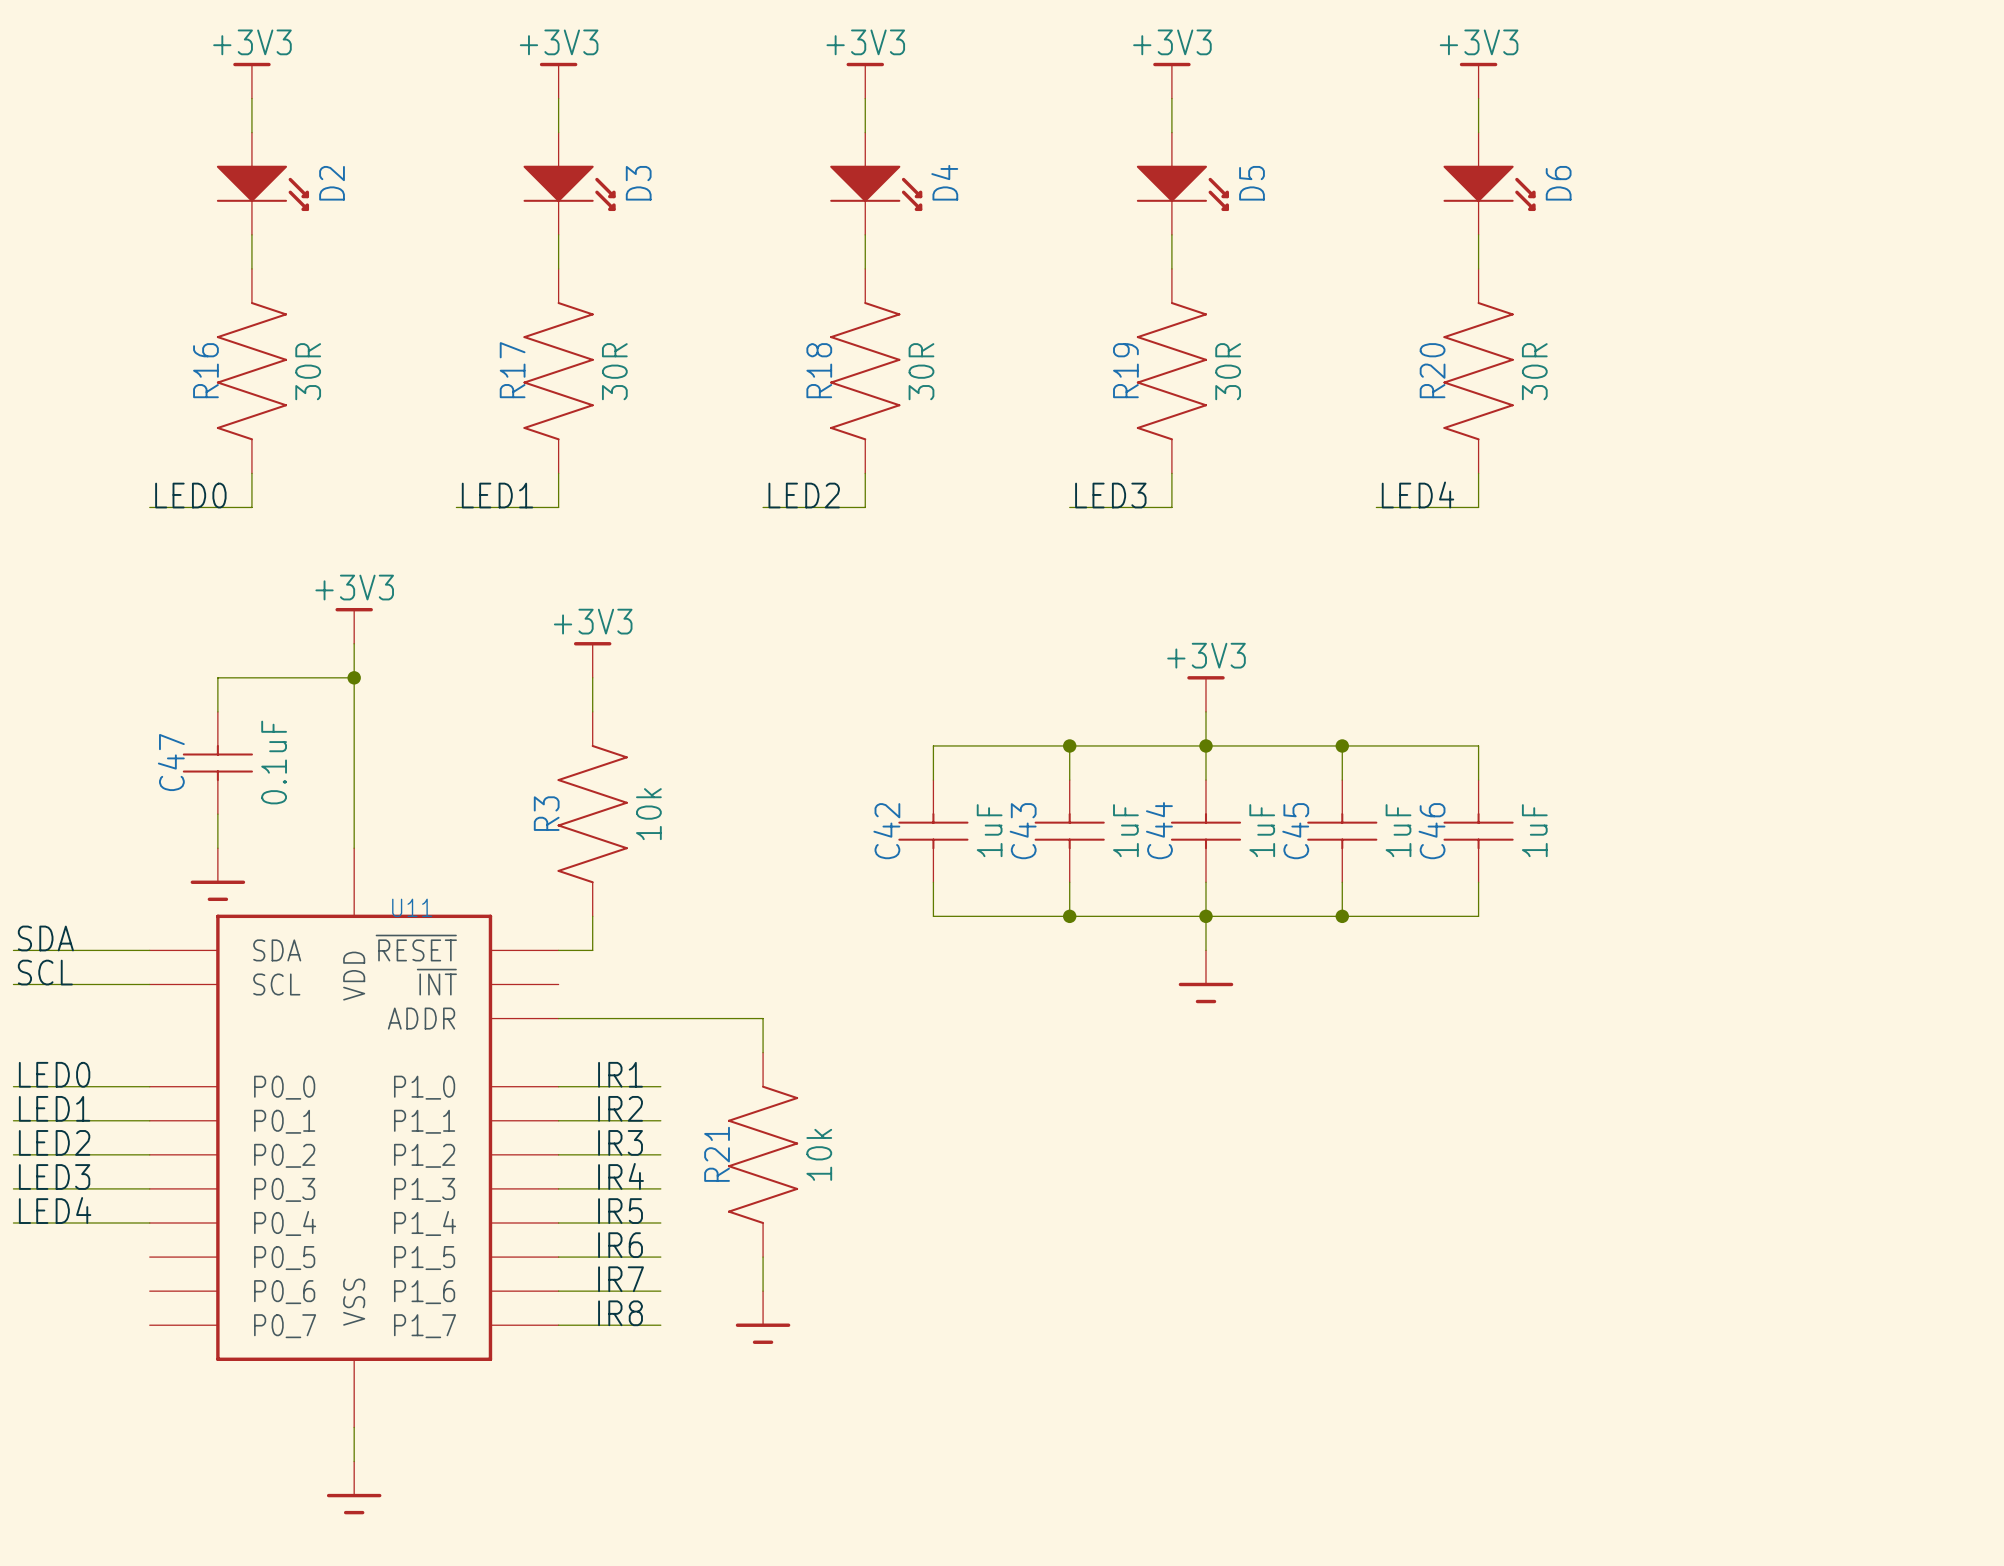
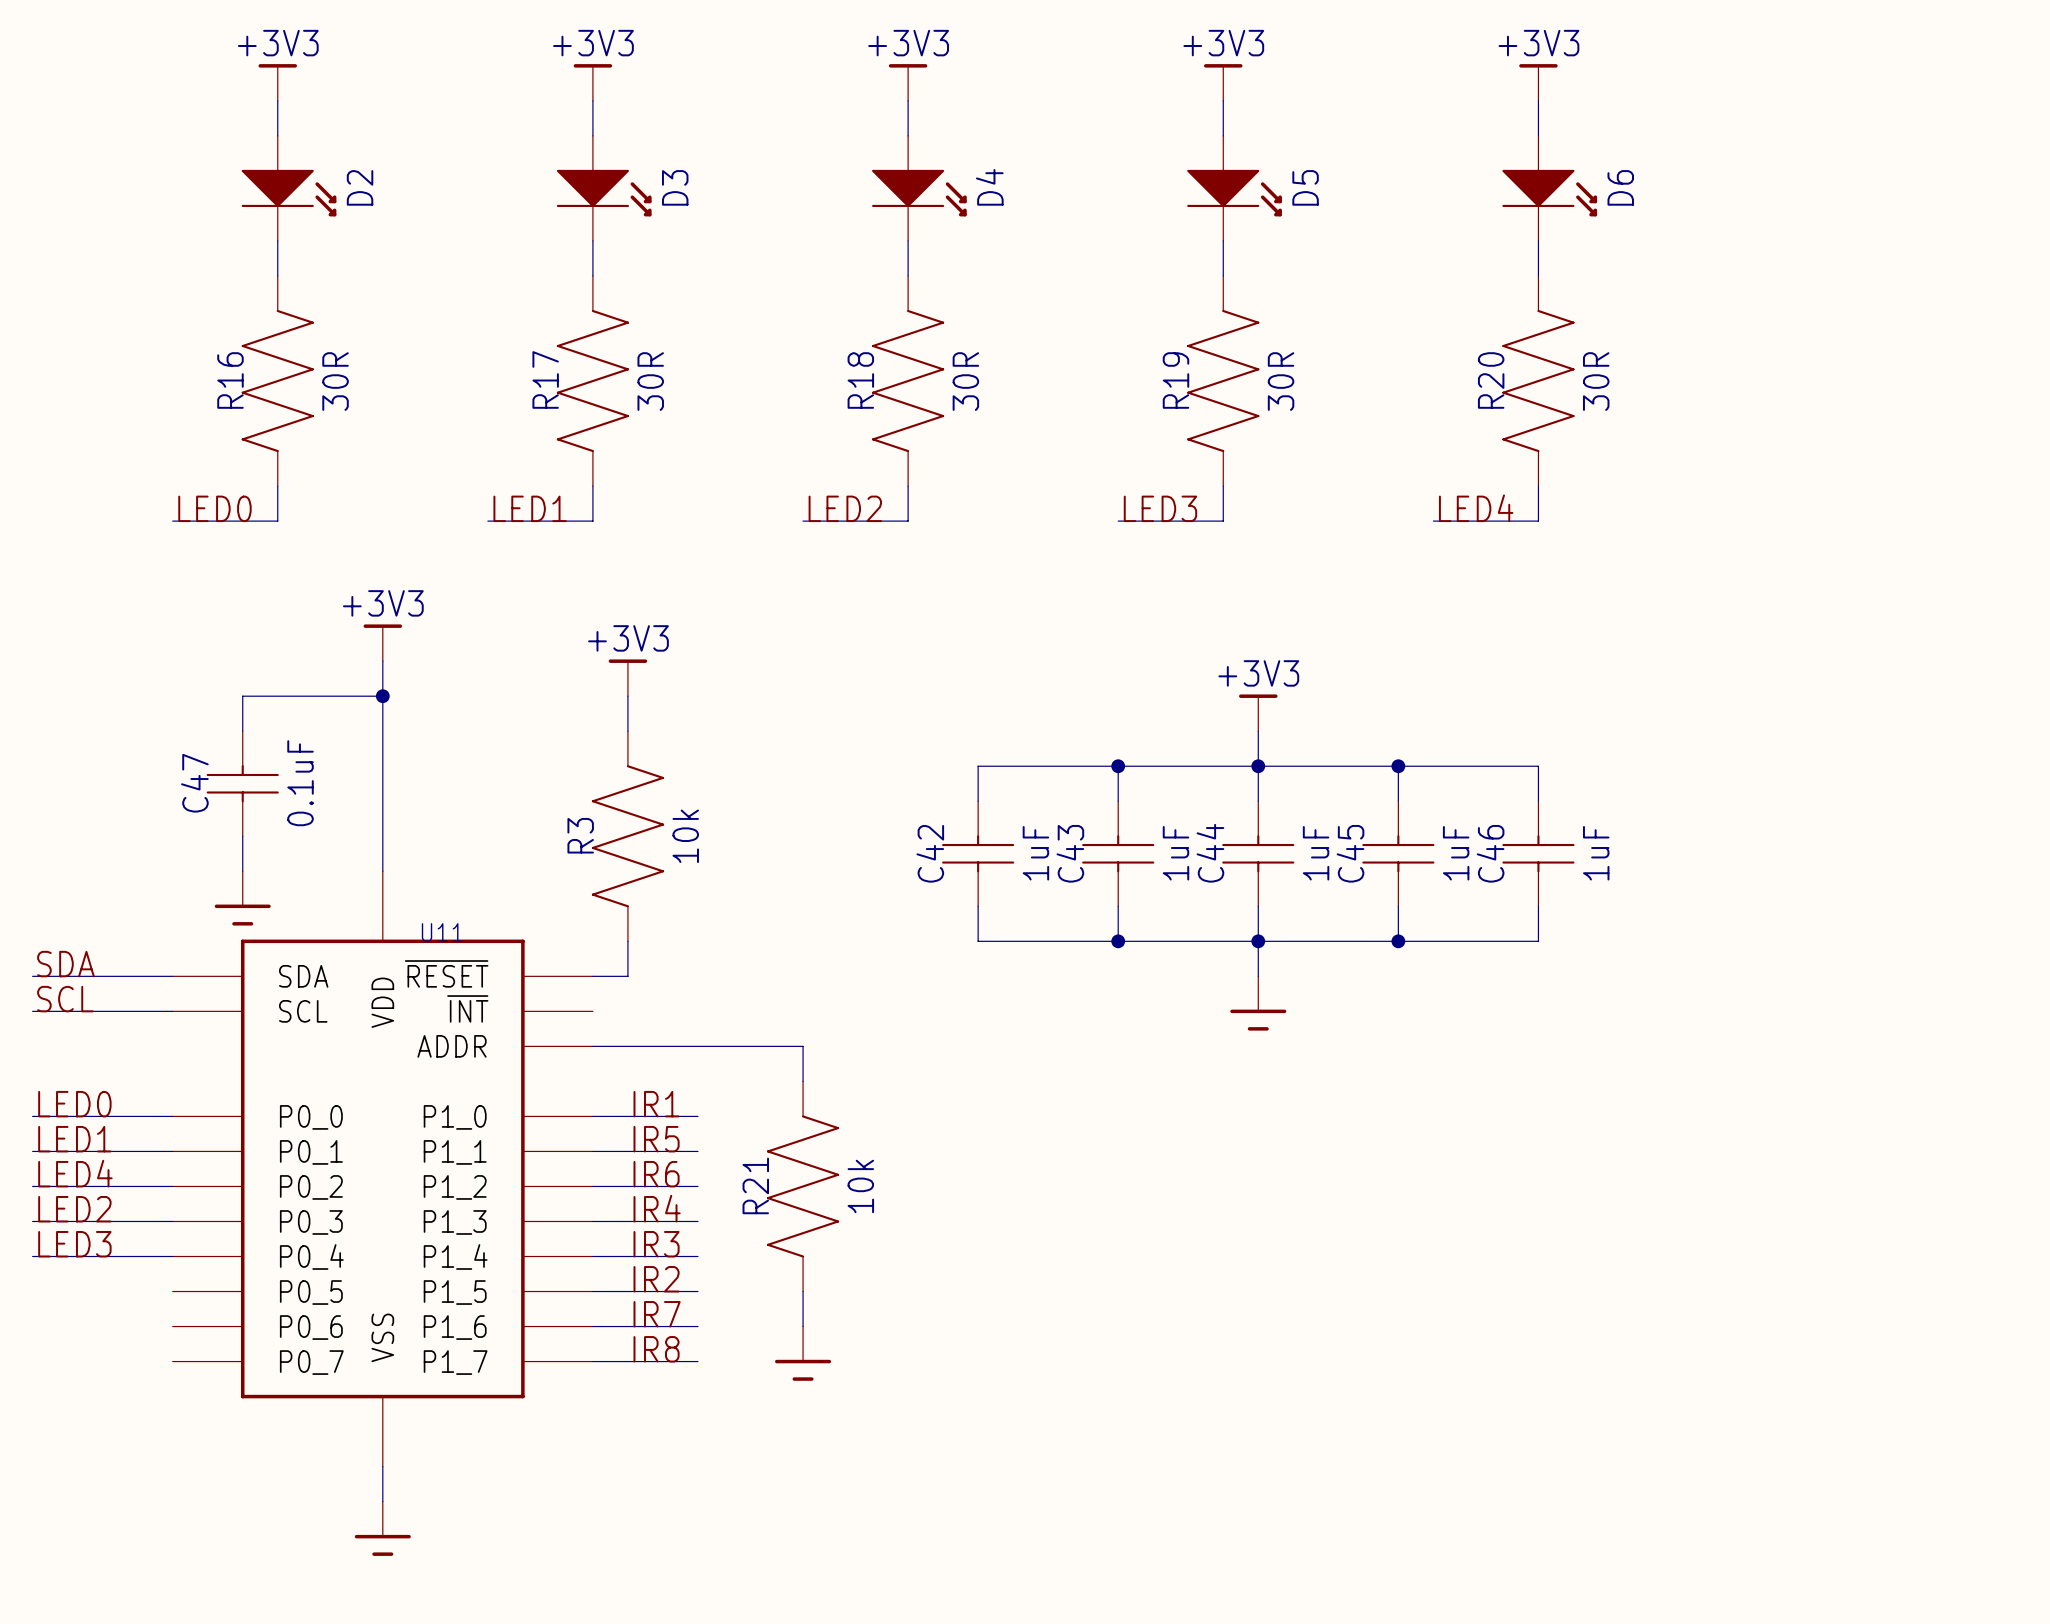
label: IR2 (620, 1108) -> IR5 (656, 1139)
label: LED2 (54, 1142) -> LED4 (75, 1173)
label: IR3 (620, 1142) -> IR6 (656, 1174)
label: LED3 (54, 1177) -> LED2 (74, 1209)
label: LED4 (55, 1210) -> LED3 (74, 1244)
label: IR5 (620, 1211) -> IR3 (656, 1244)
label: IR6 (620, 1245) -> IR2 (656, 1279)

